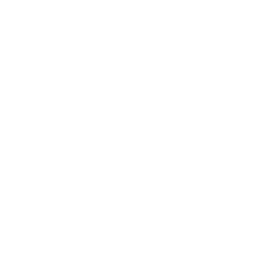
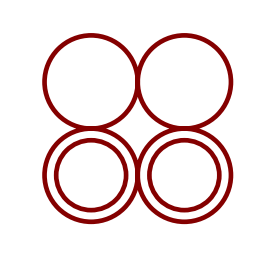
part: none -> (91, 81)
part: none -> (184, 81)
part: none -> (91, 175)
part: none -> (184, 175)

